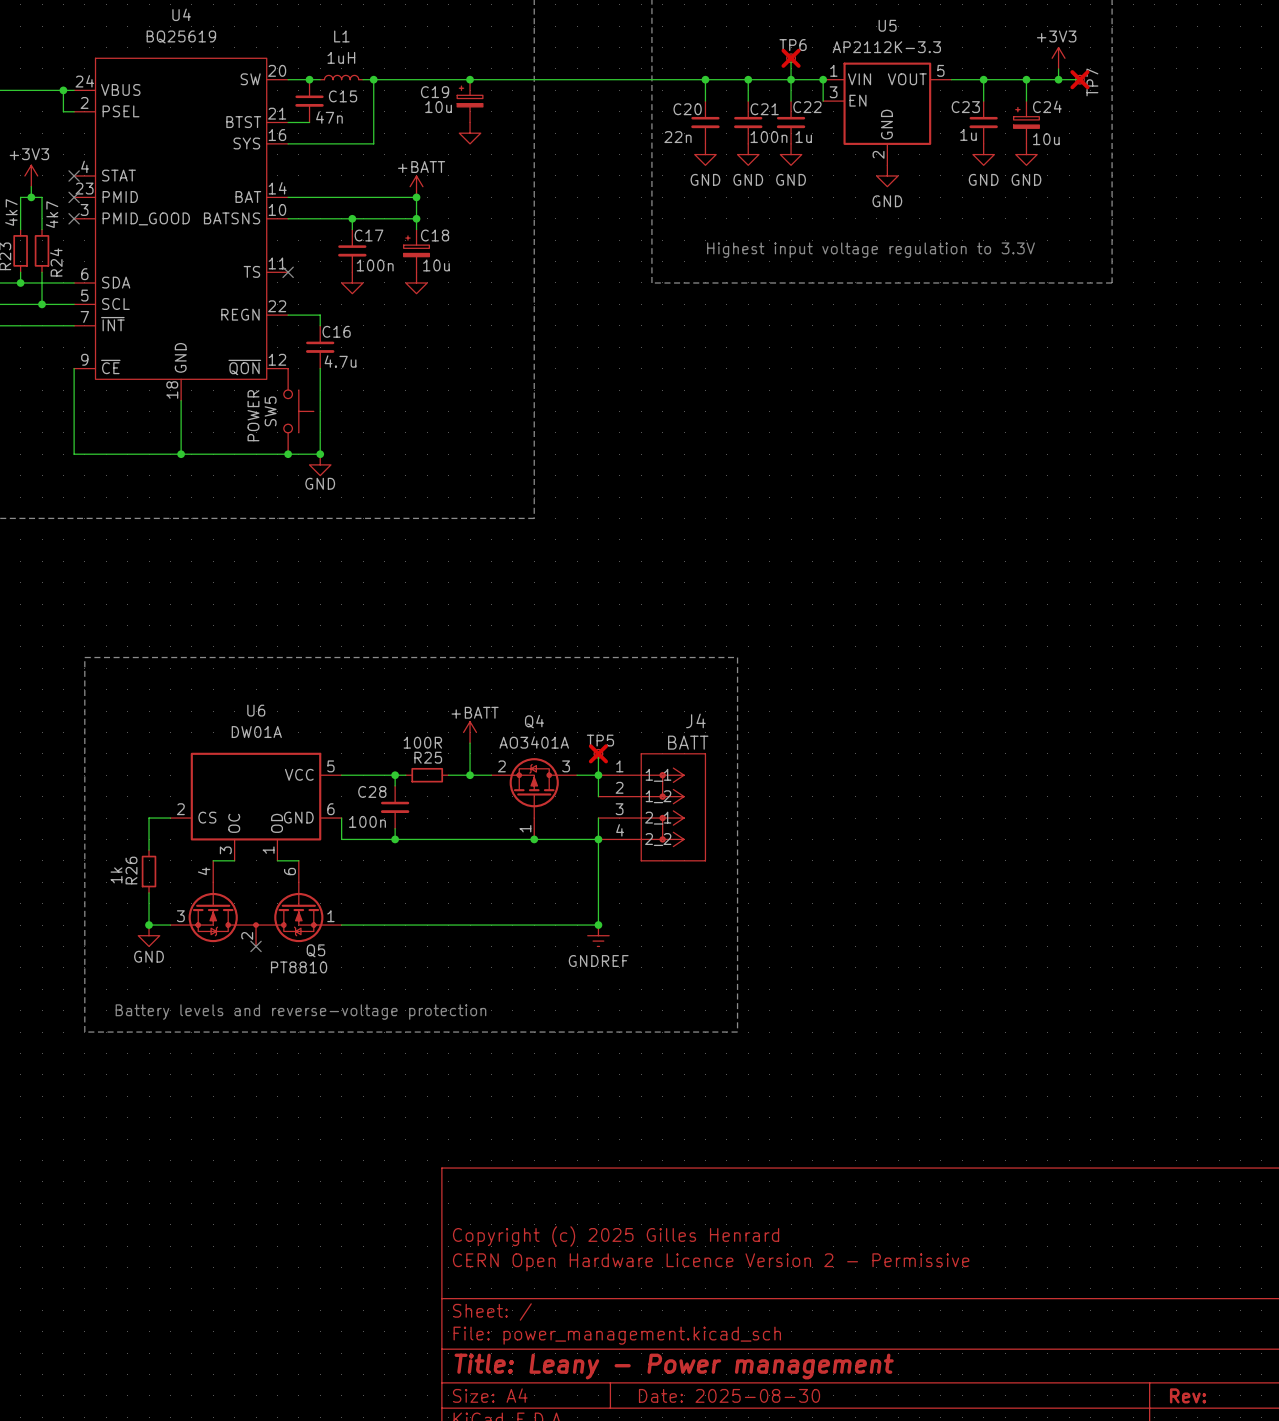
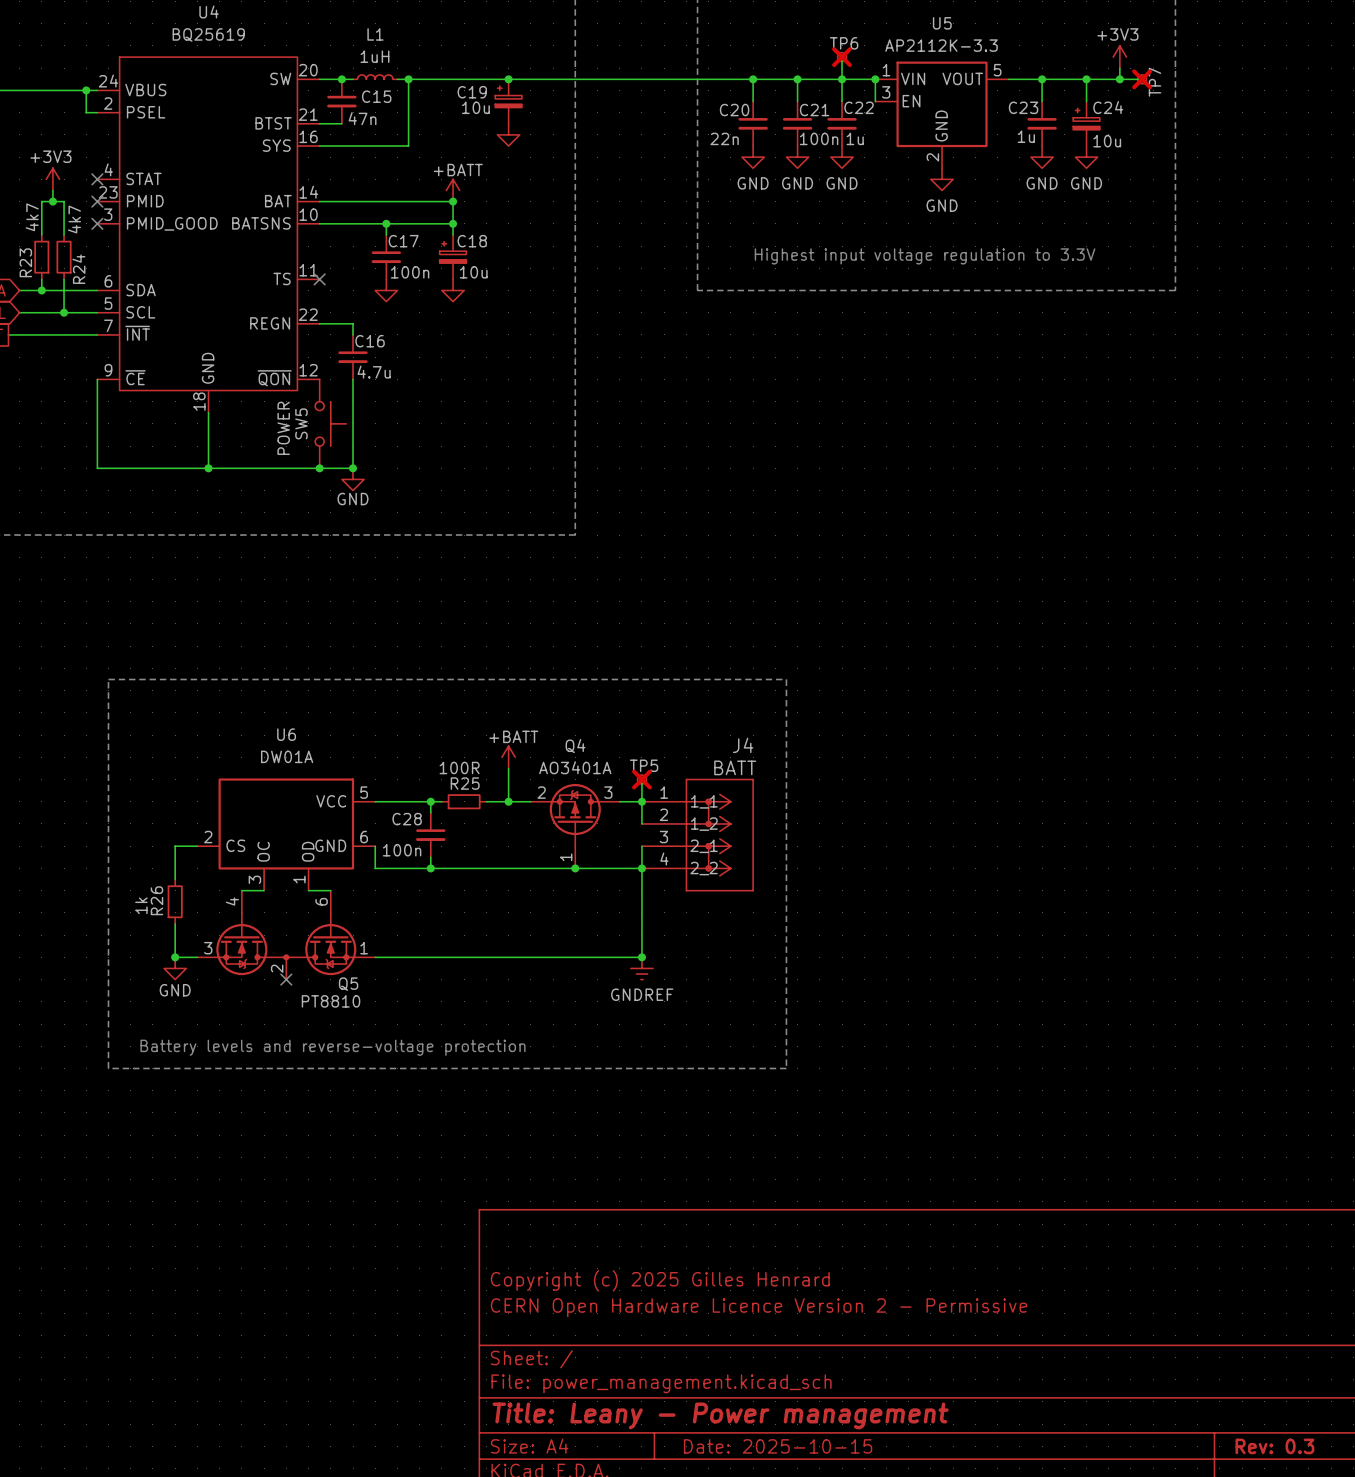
title block: Date: 2025-08-30 (729, 1395) -> Date: 2025-10-15 (778, 1446)
title block: Rev: (1188, 1395) -> Rev: 0.3 (1274, 1446)

